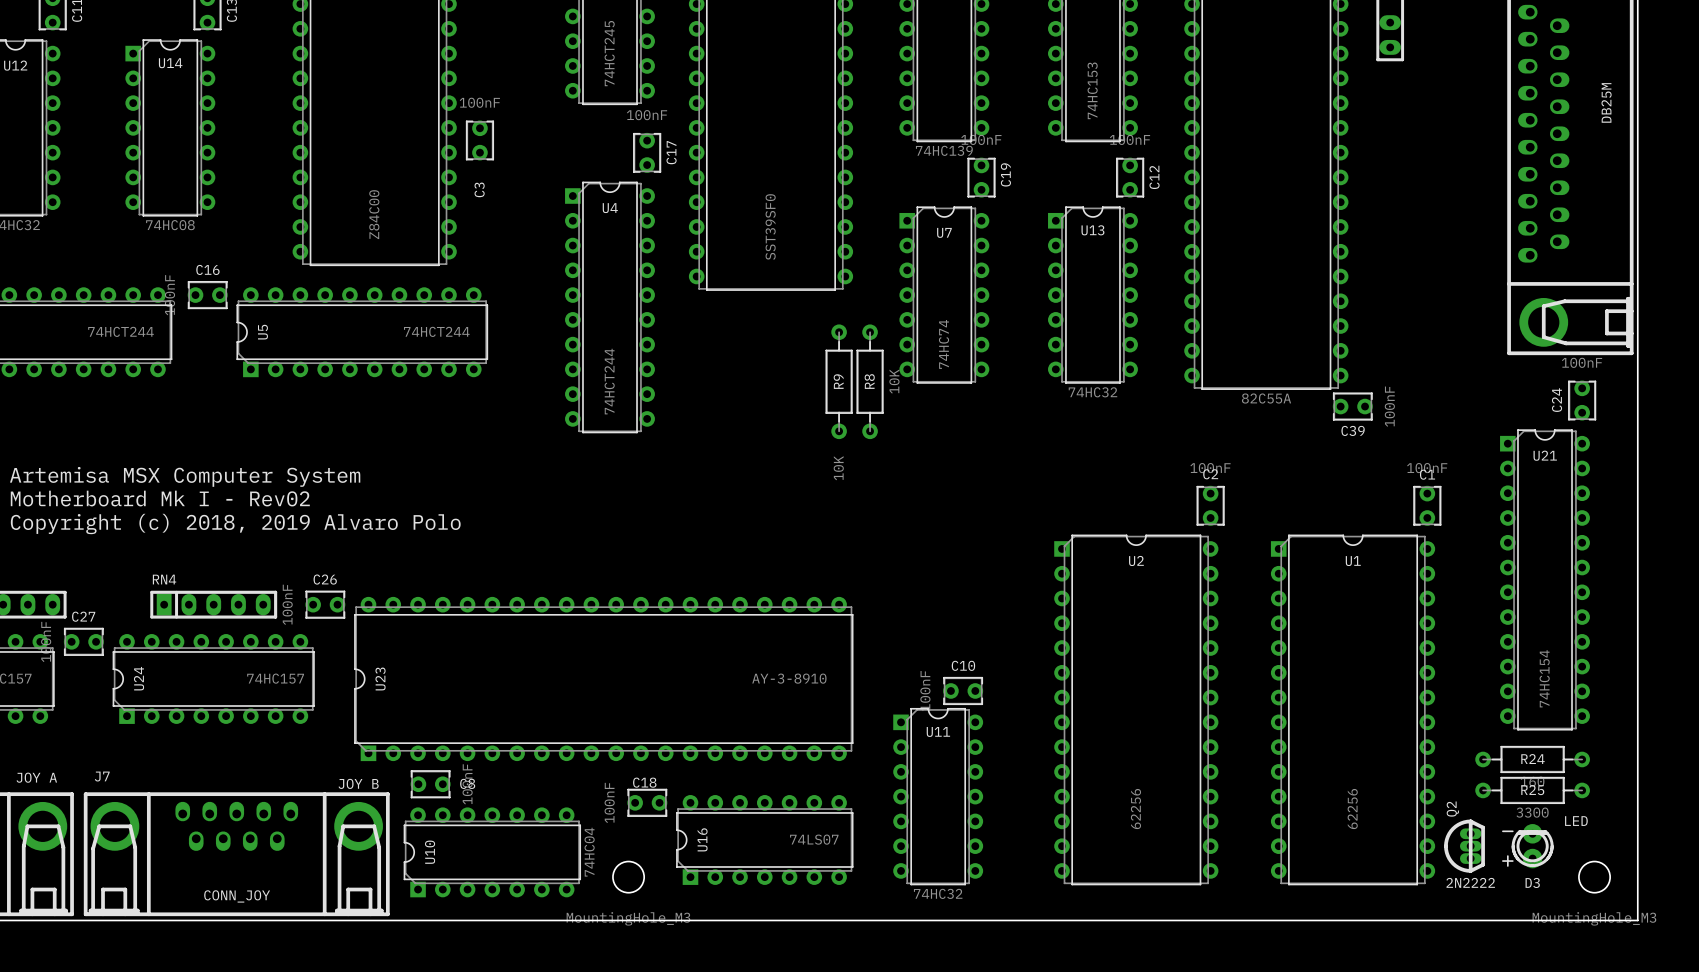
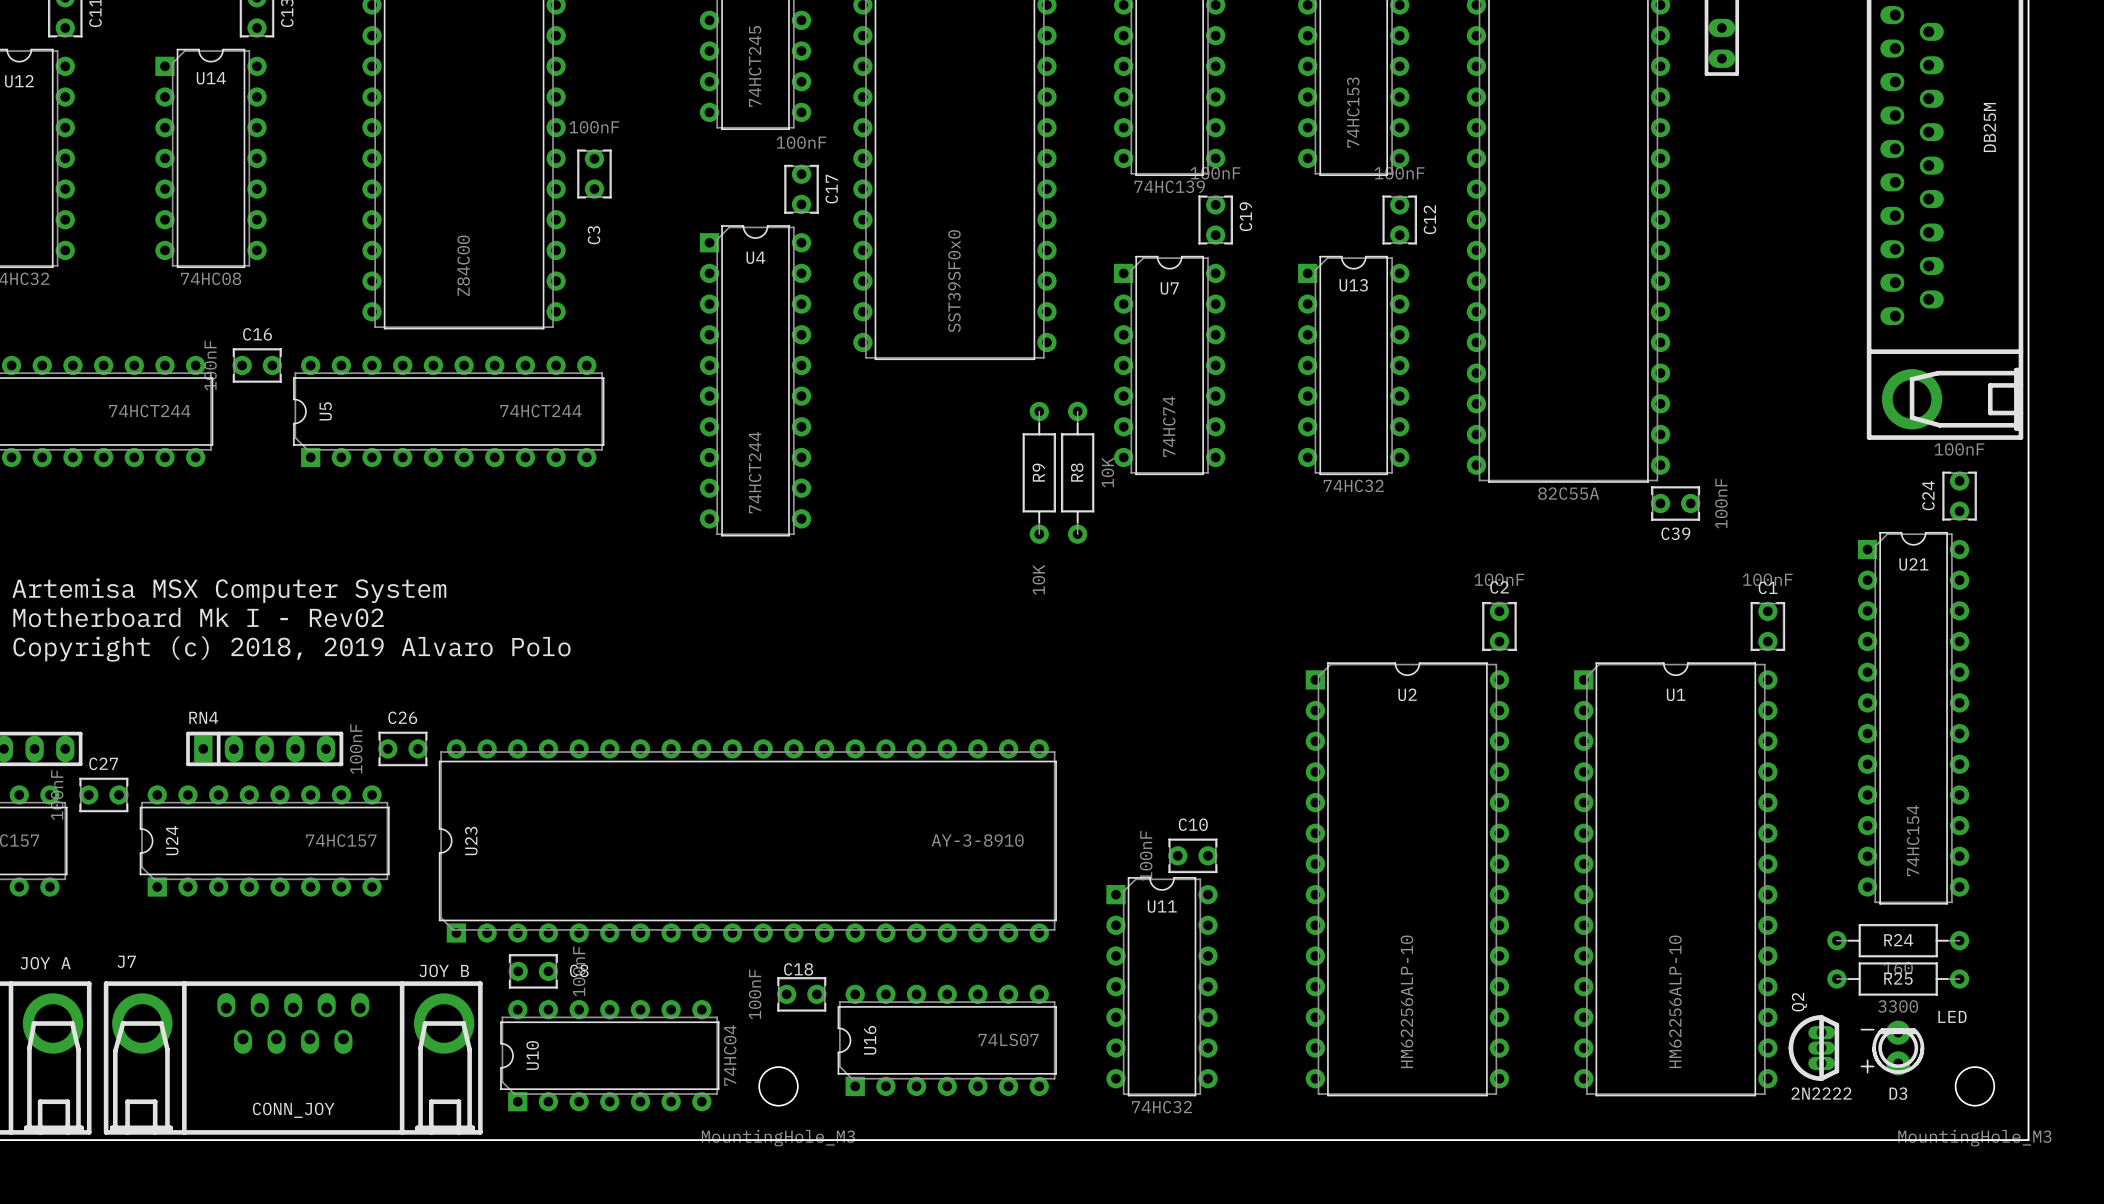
part value: SST39SF0 (770, 227) -> SST39SF0x0 (954, 281)
U2 value: 62256 (1135, 809) -> HM62256ALP-10 (1406, 1001)
U1 value: 62256 (1352, 809) -> HM62256ALP-10 (1675, 1001)

